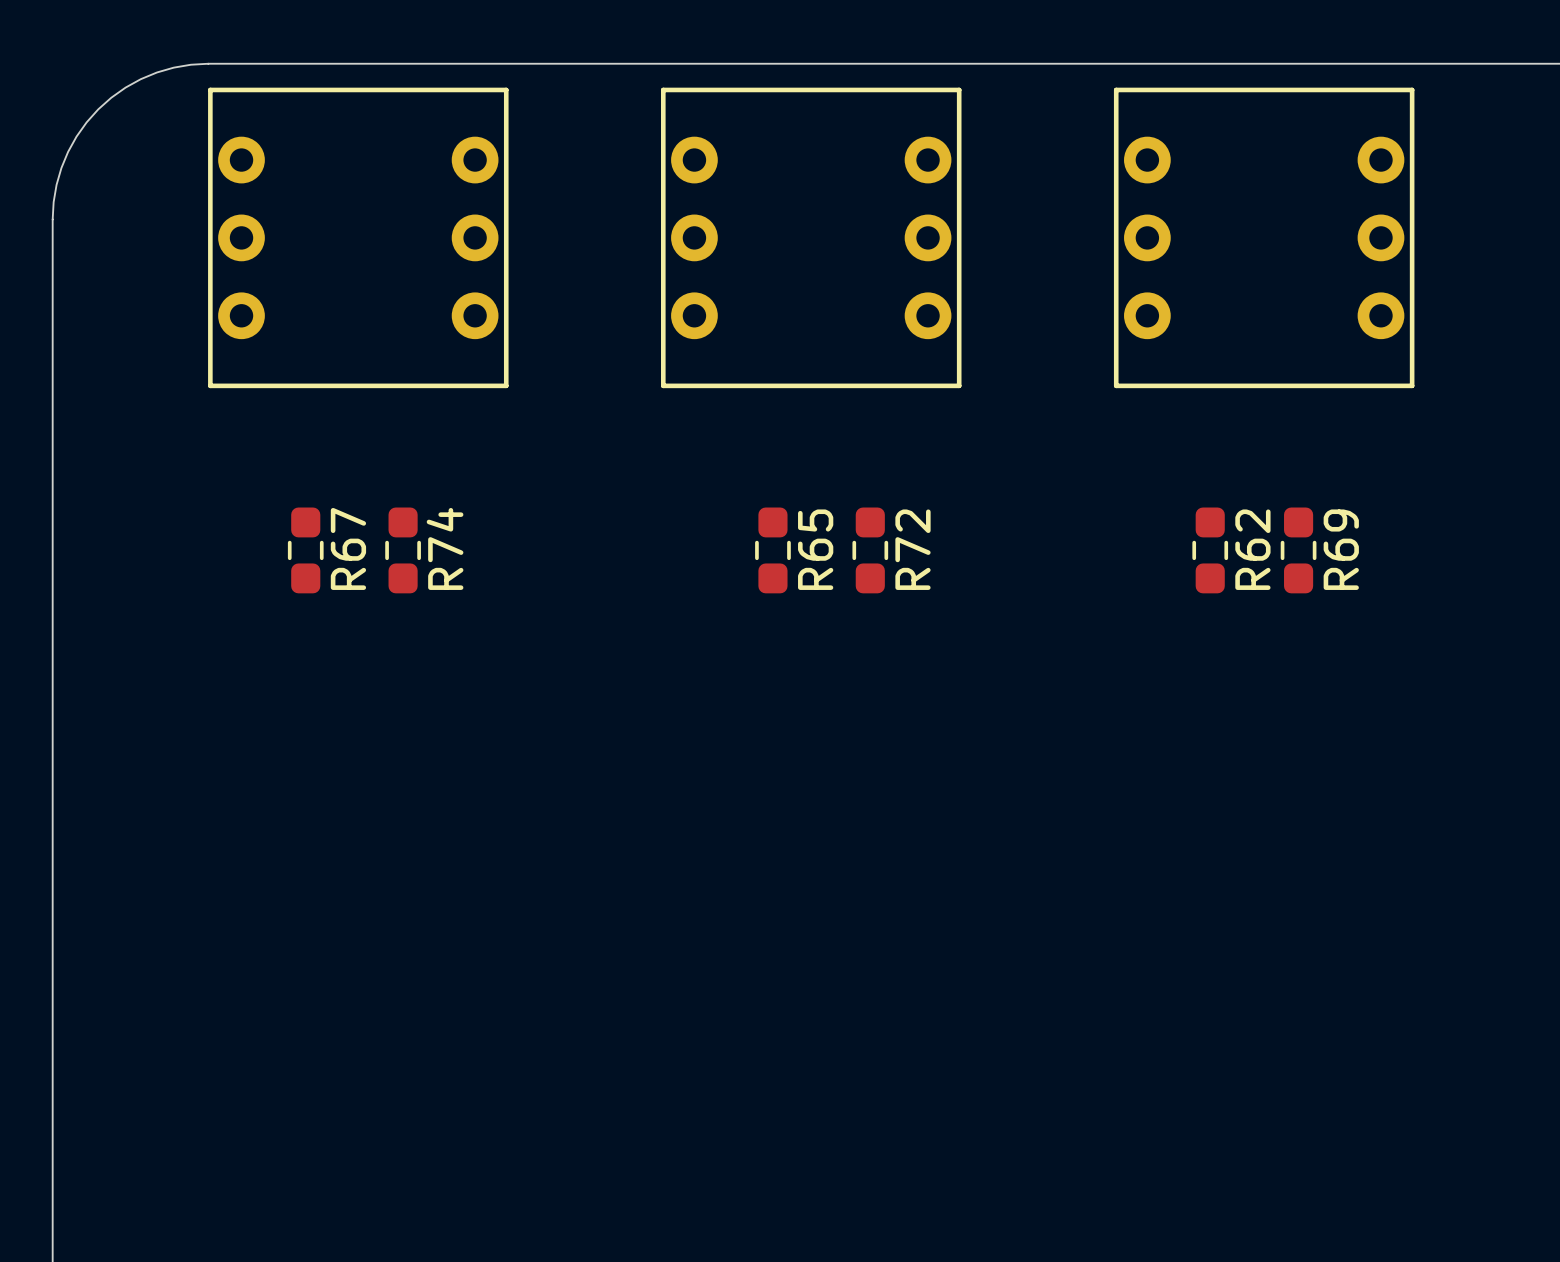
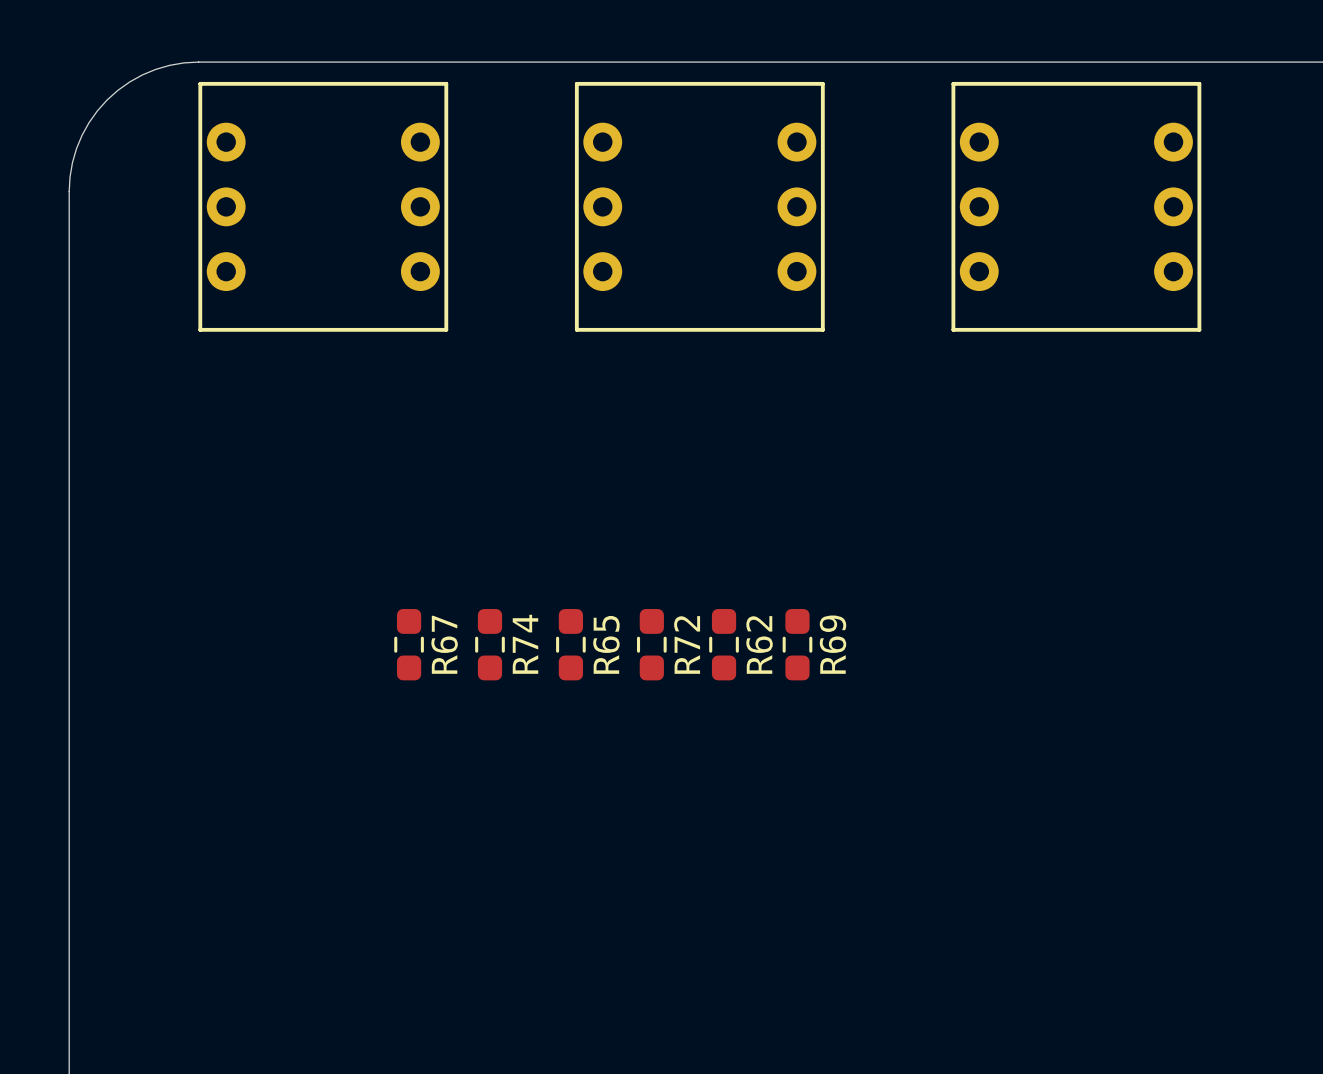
R67 position: (305, 550) -> (409, 644)
R74 position: (403, 550) -> (489, 644)
R65 position: (772, 550) -> (570, 644)
R72 position: (870, 550) -> (651, 644)
R62 position: (1210, 550) -> (724, 644)
R69 position: (1298, 550) -> (797, 644)

